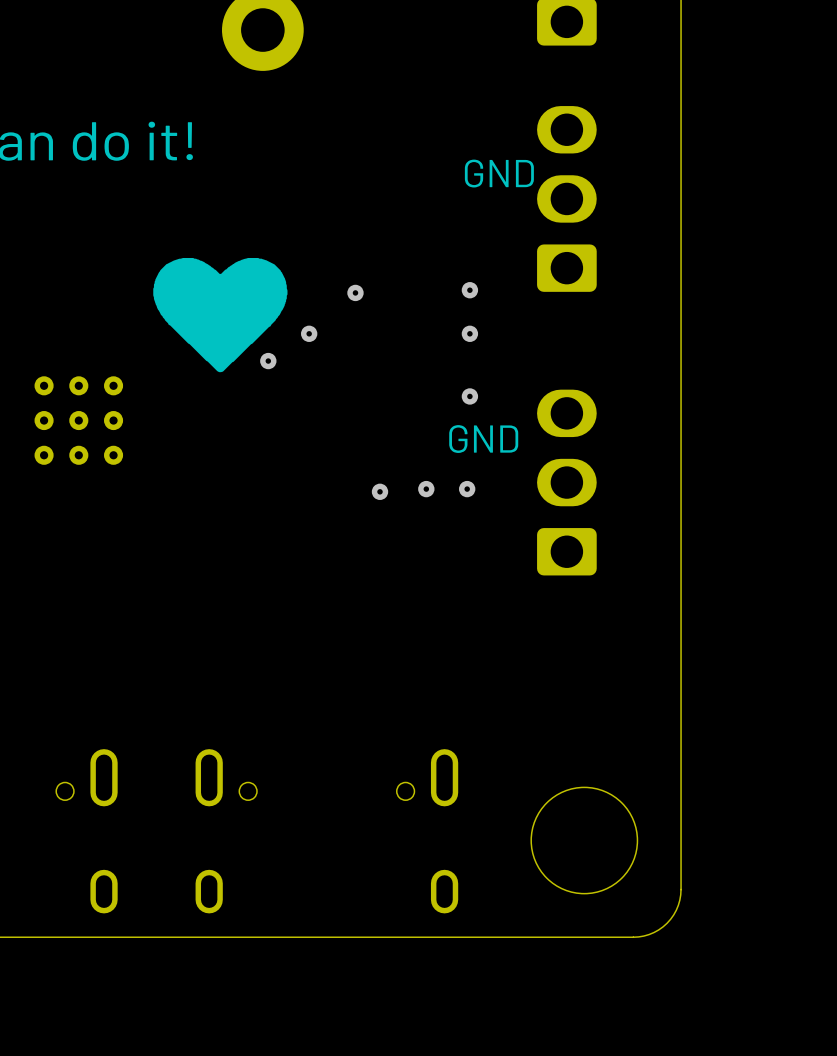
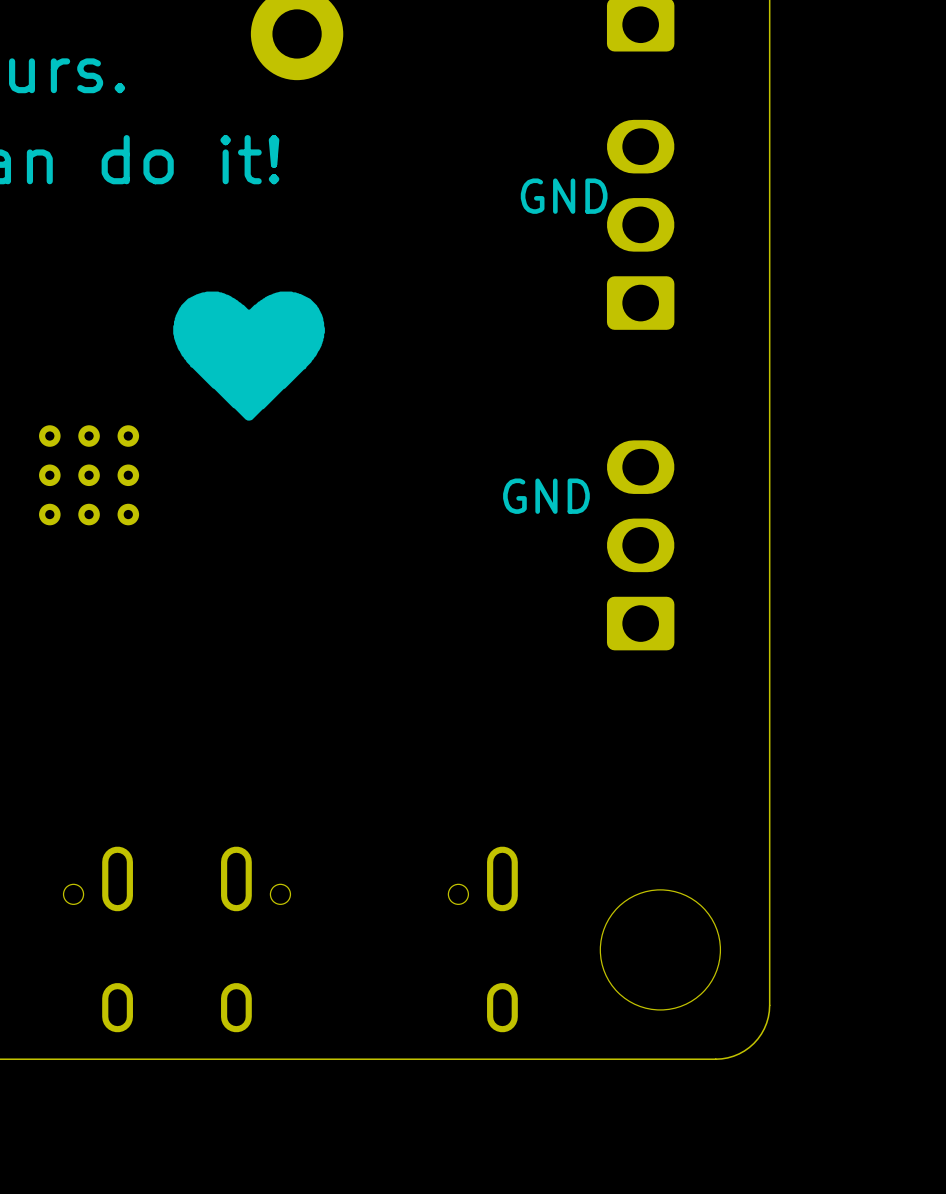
via: (469, 290) -> none
via: (355, 292) -> none
via: (309, 333) -> none
via: (469, 333) -> none
via: (268, 361) -> none
via: (469, 396) -> none
via: (426, 489) -> none
via: (467, 489) -> none
via: (380, 491) -> none

